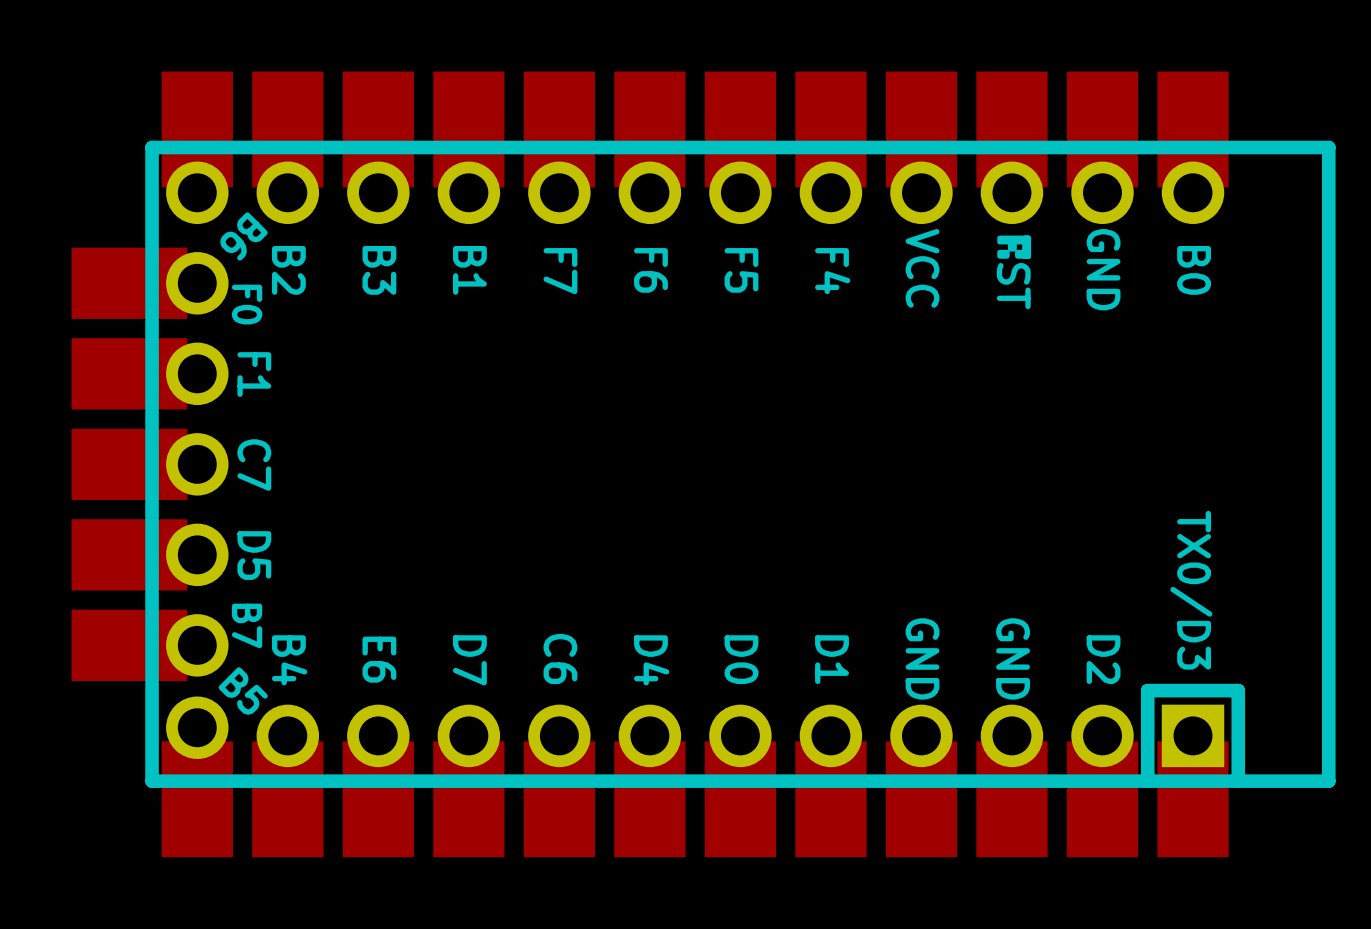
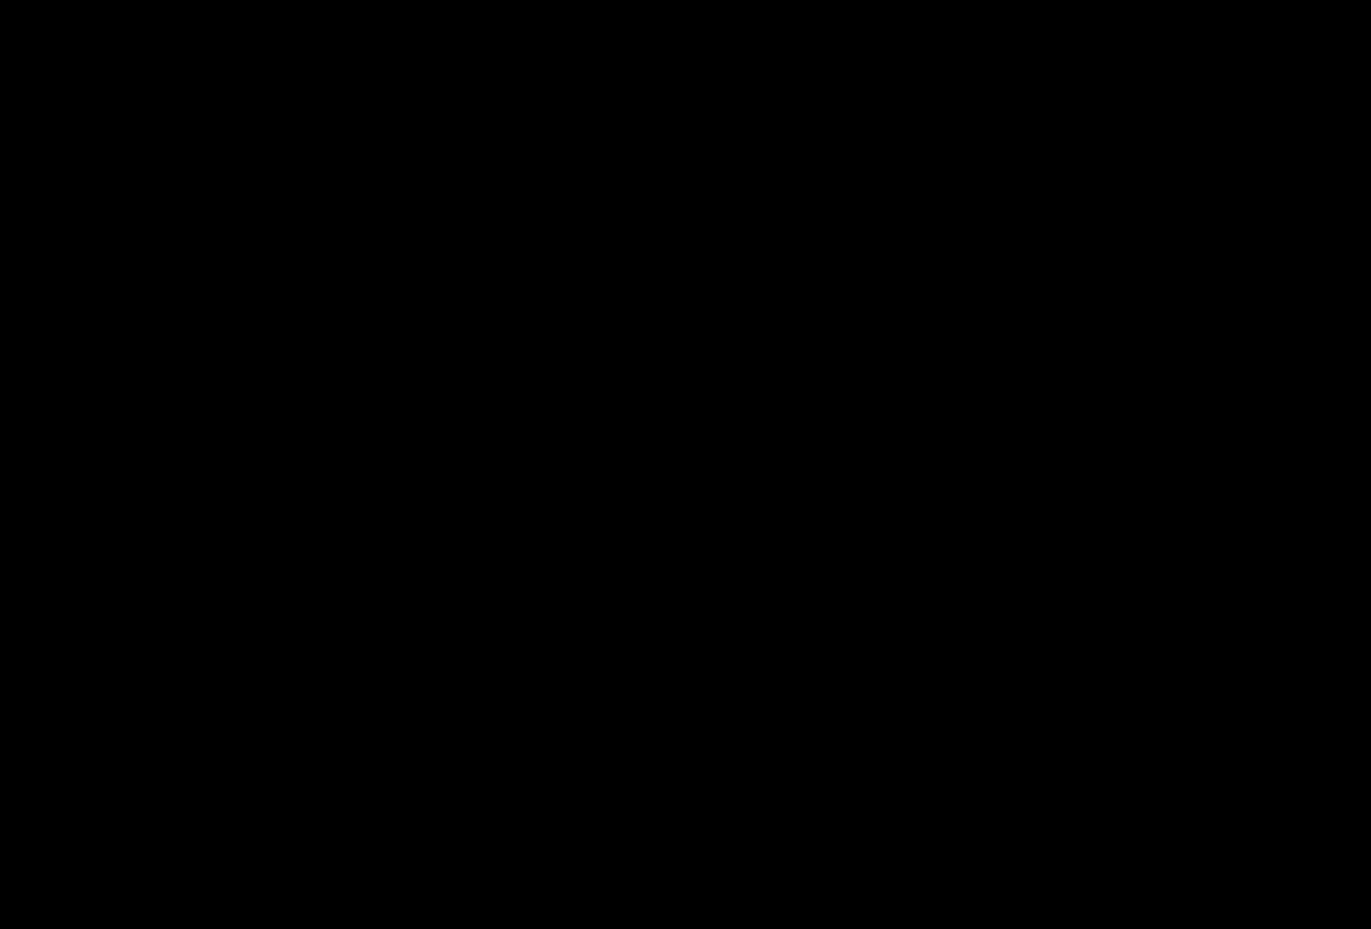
part: (703, 464) -> none

